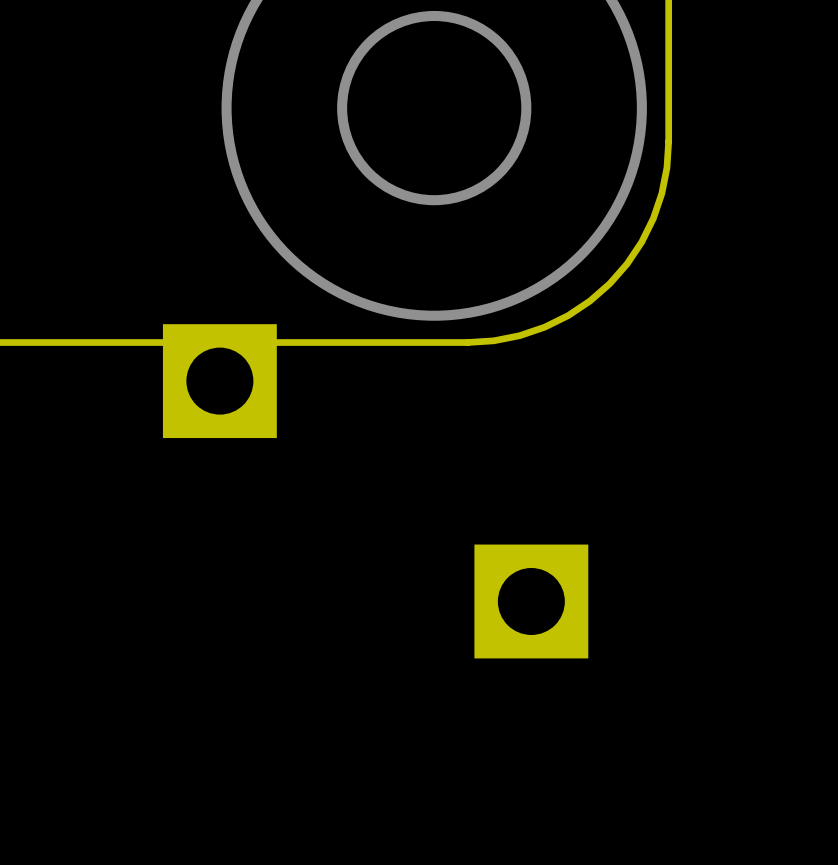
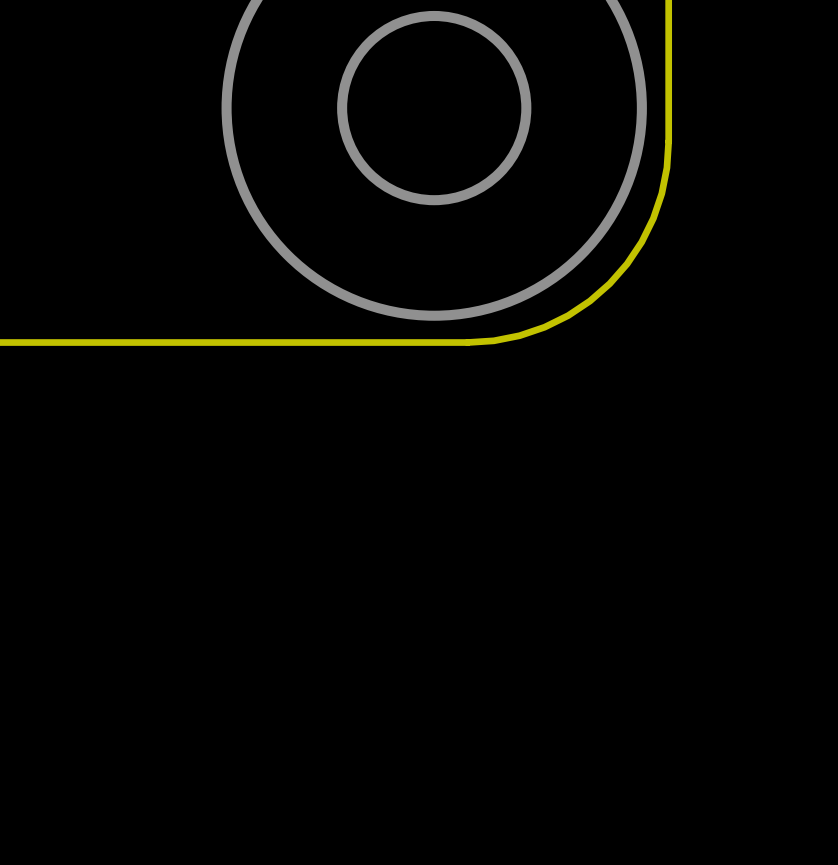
part: (219, 381) -> none
part: (531, 601) -> none

